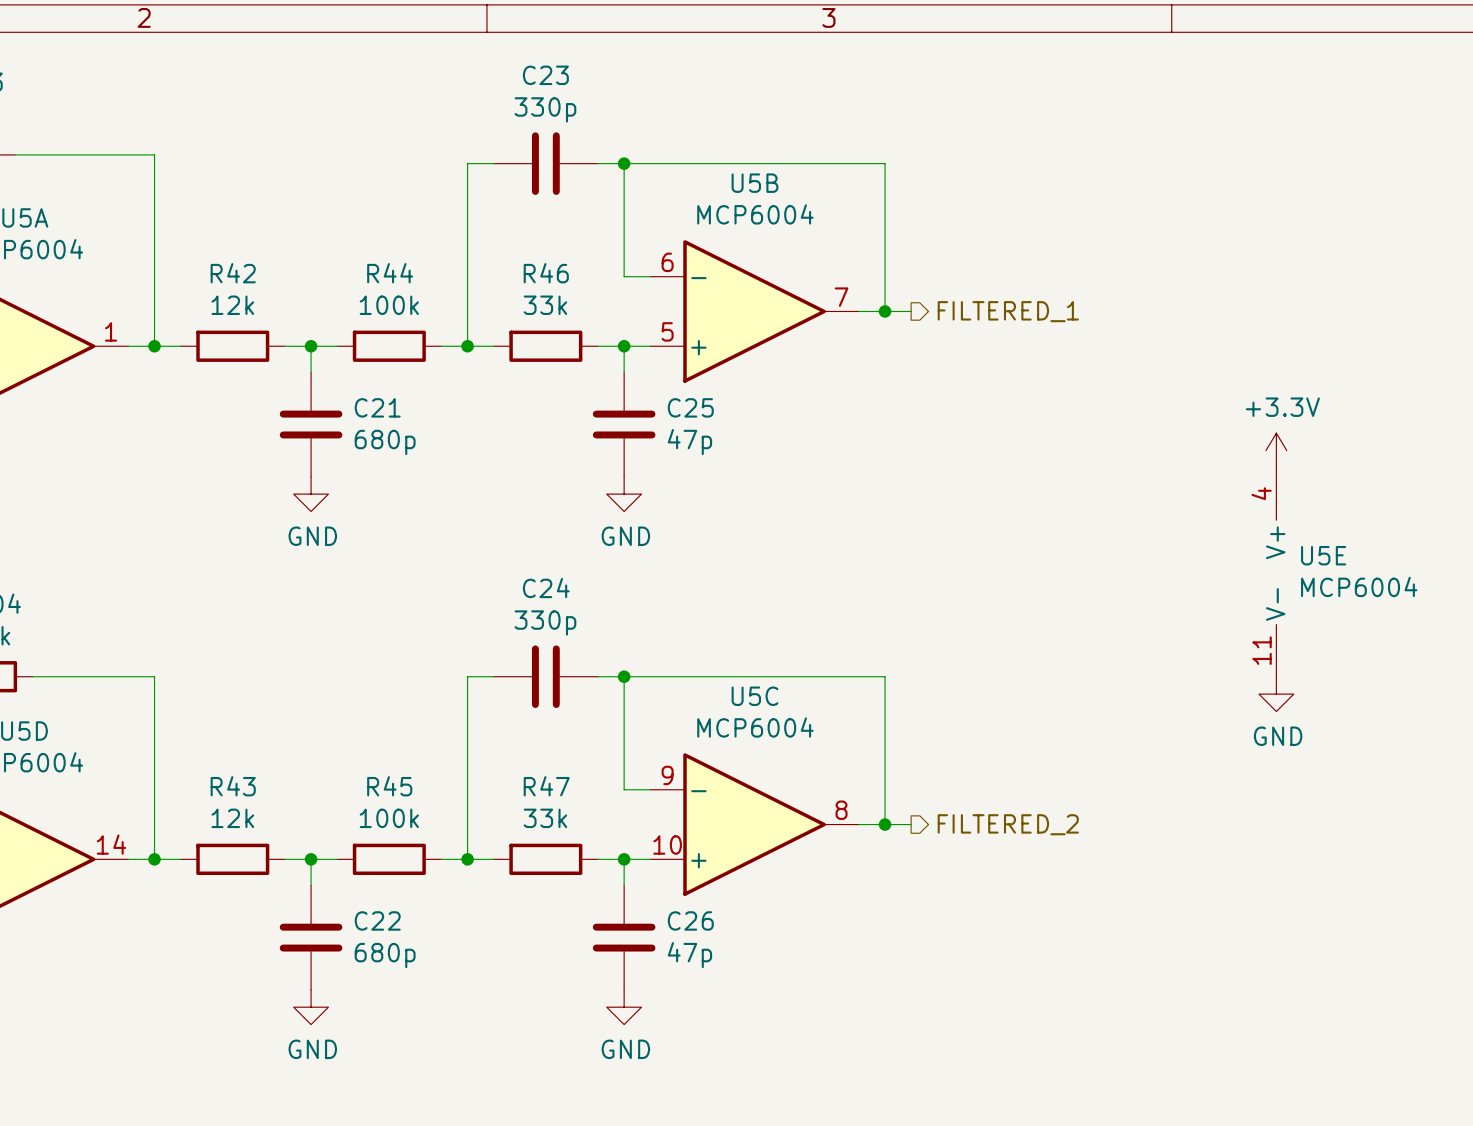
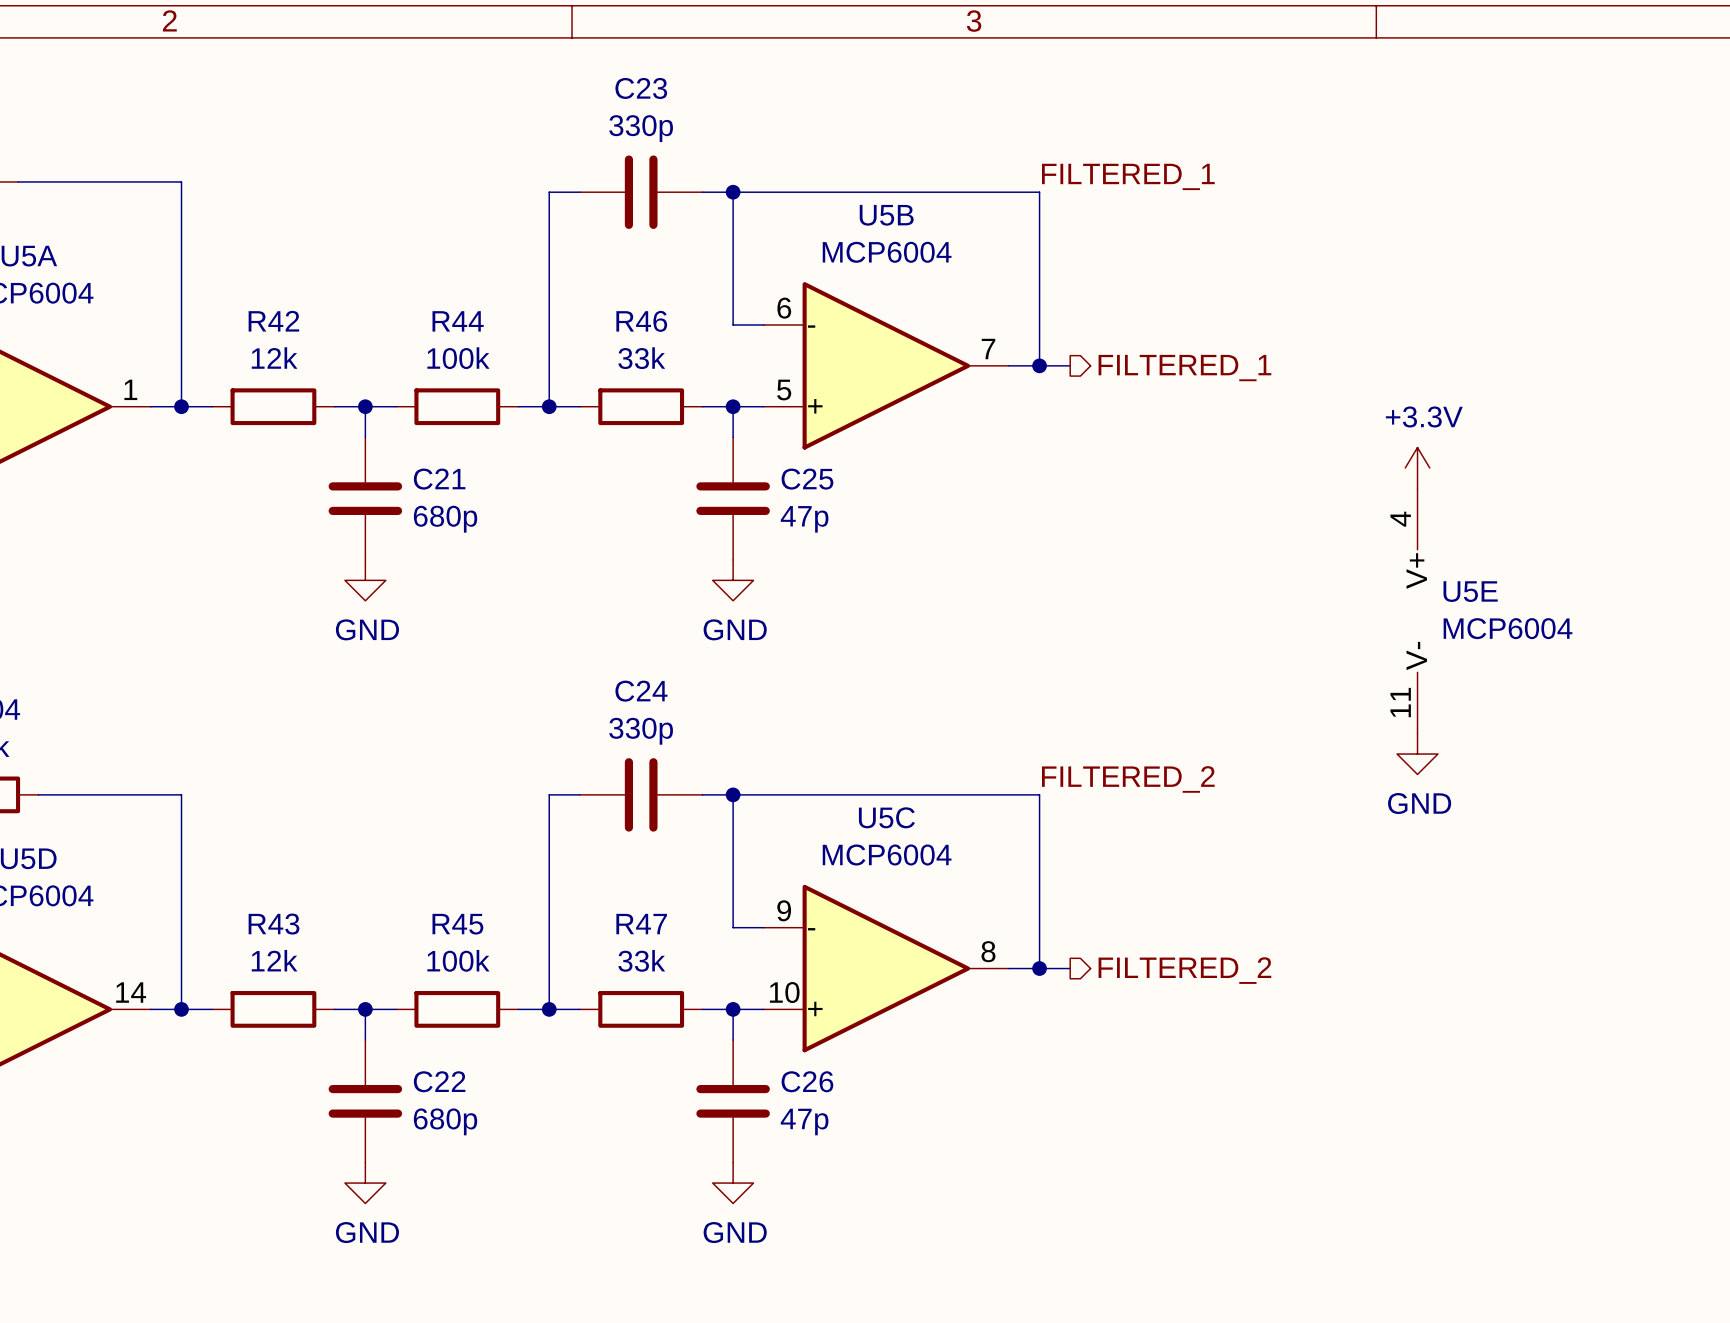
label: none -> FILTERED_1 (1128, 176)
power symbol position: +3.3V (1276, 450) -> +3.3V (1417, 468)
U5E position: (1276, 572) -> (1417, 611)
label: none -> FILTERED_2 (1128, 779)
power symbol position: GND (1276, 694) -> GND (1417, 754)

